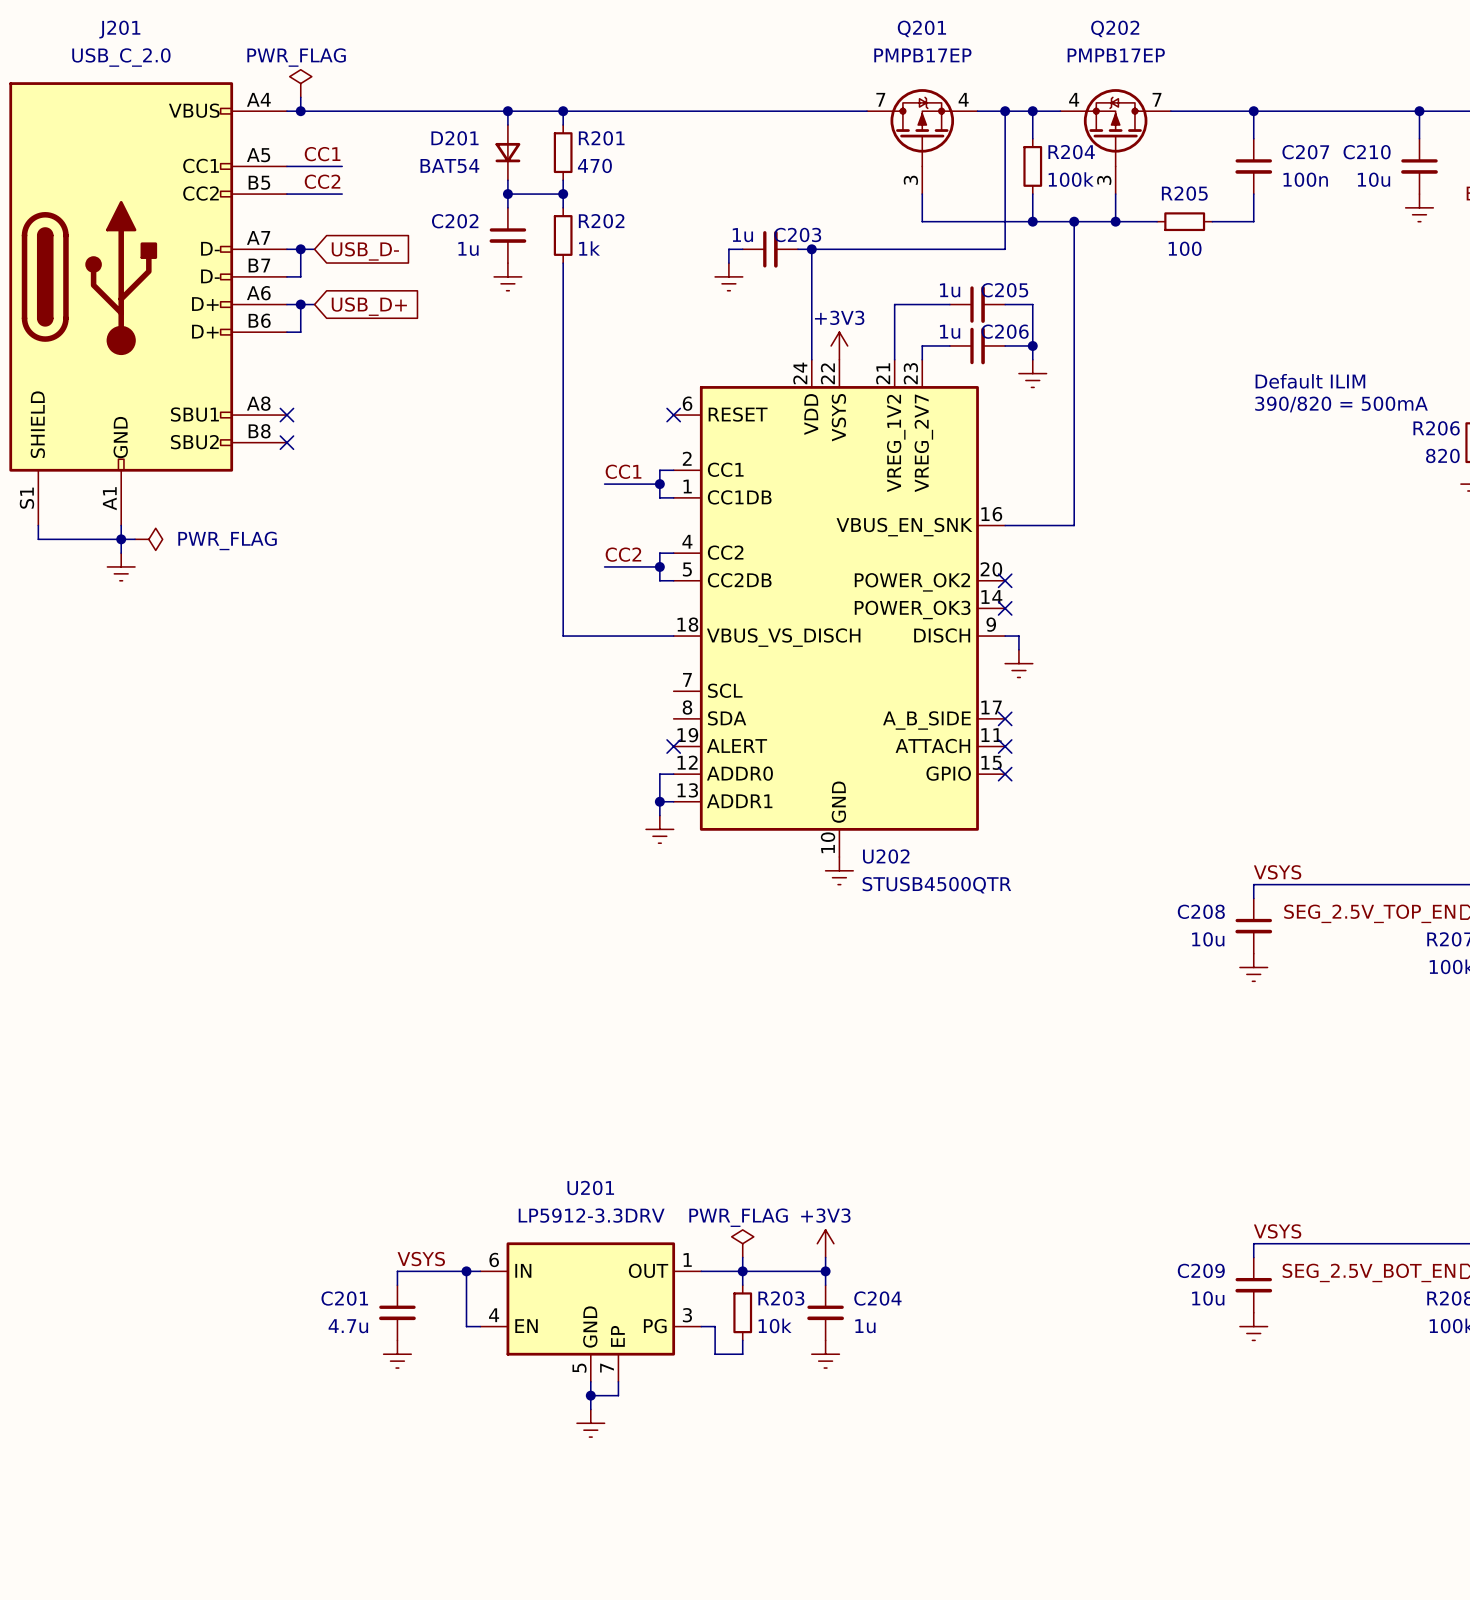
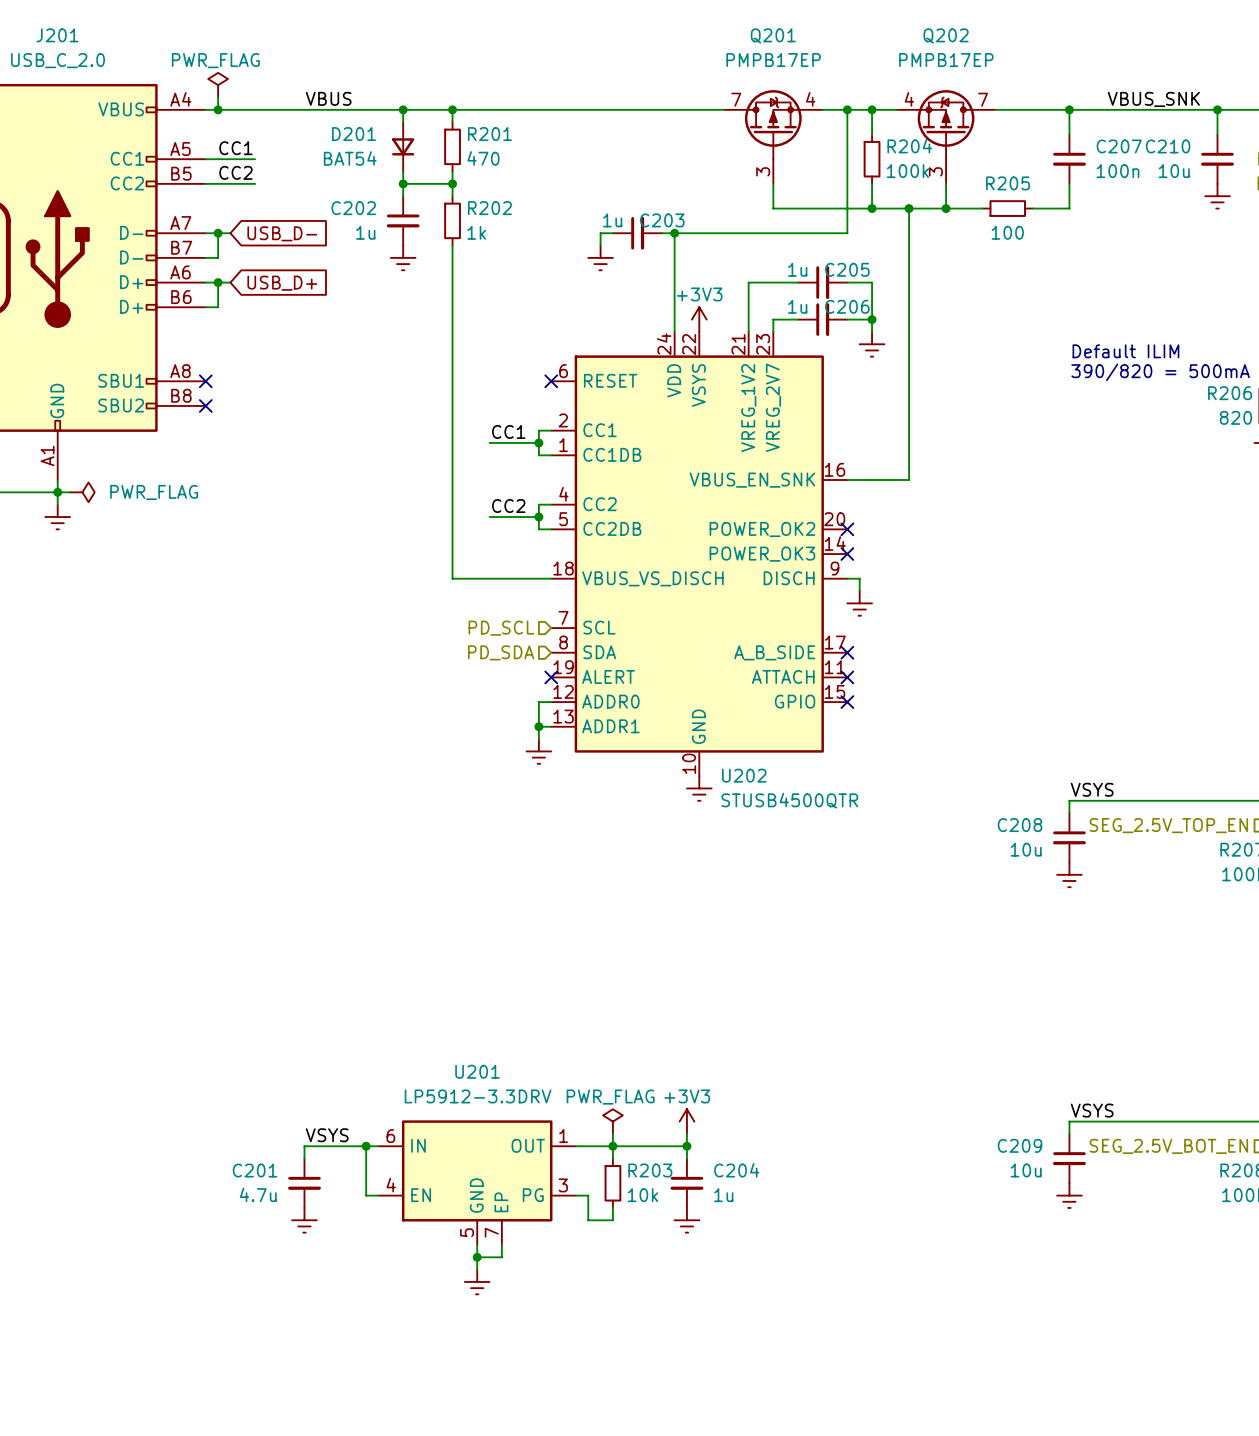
label: none -> VBUS (328, 98)
label: none -> VBUS_SNK (1153, 99)
hierarchical label: none -> PD_SCL (501, 628)
hierarchical label: none -> PD_SDA (501, 652)

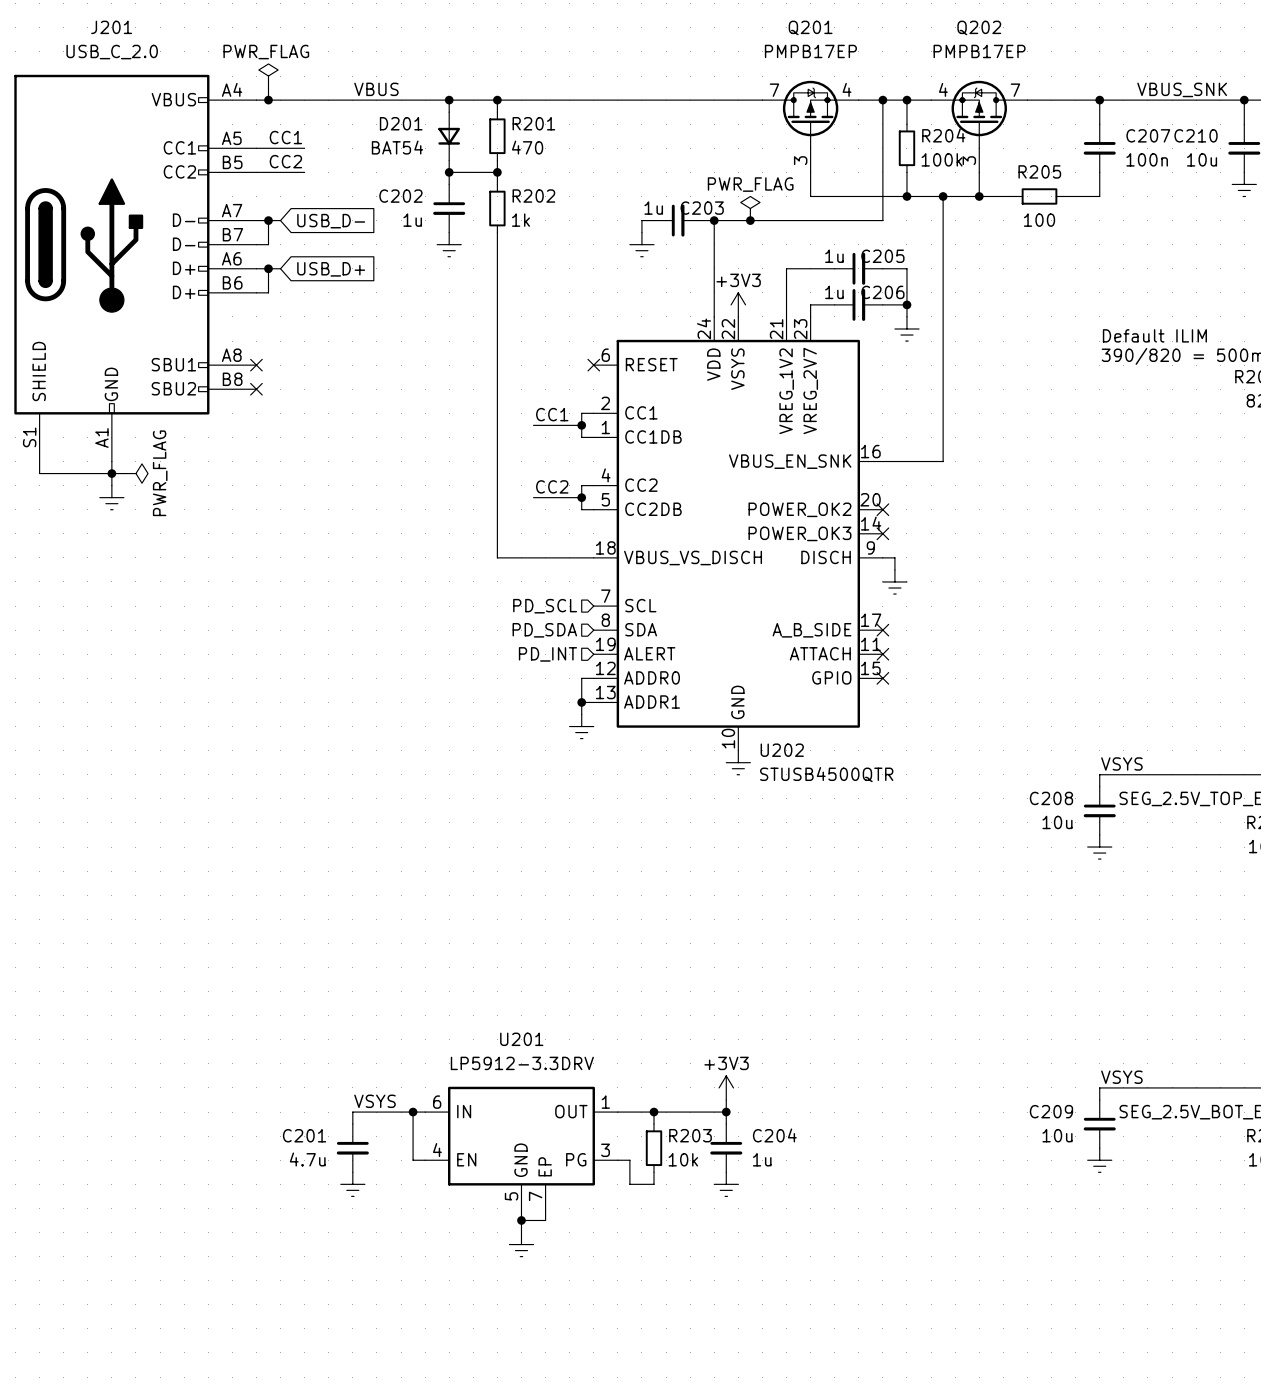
power symbol: none -> PWR_FLAG (750, 208)
junction: none -> (750, 220)
power symbol text rotation: 0° (154, 492) -> 90° counterclockwise (160, 473)
hierarchical label: none -> PD_INT (547, 654)
no-connect mark: (551, 677) -> none
power symbol: PWR_FLAG (612, 1121) -> none
wire: (612, 1133) (612, 1146) -> none

